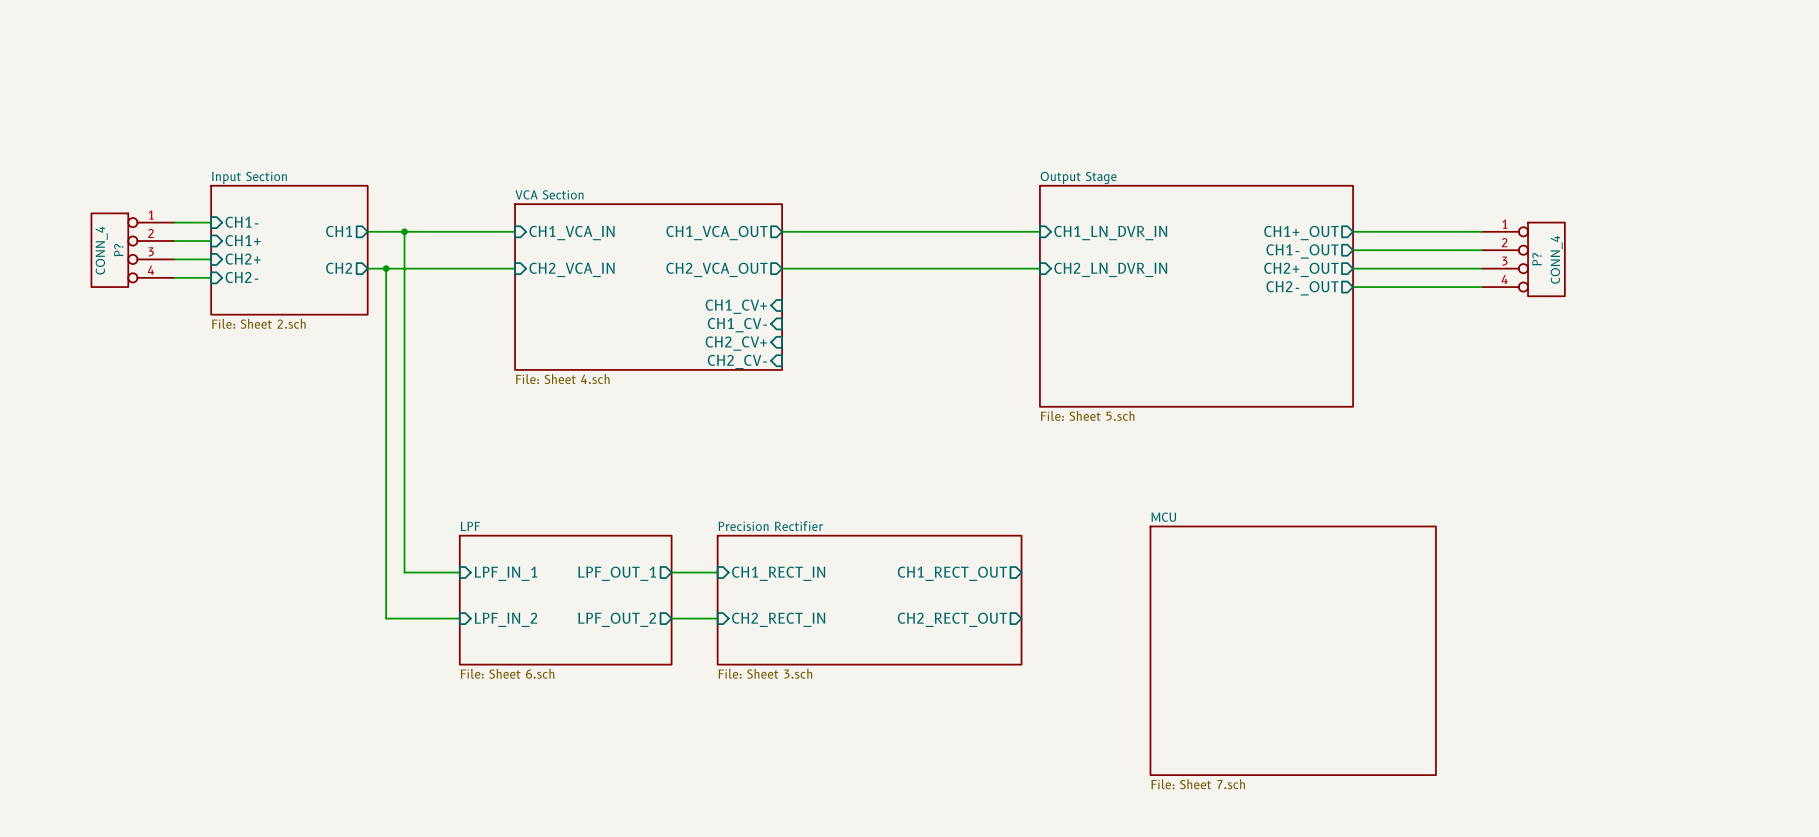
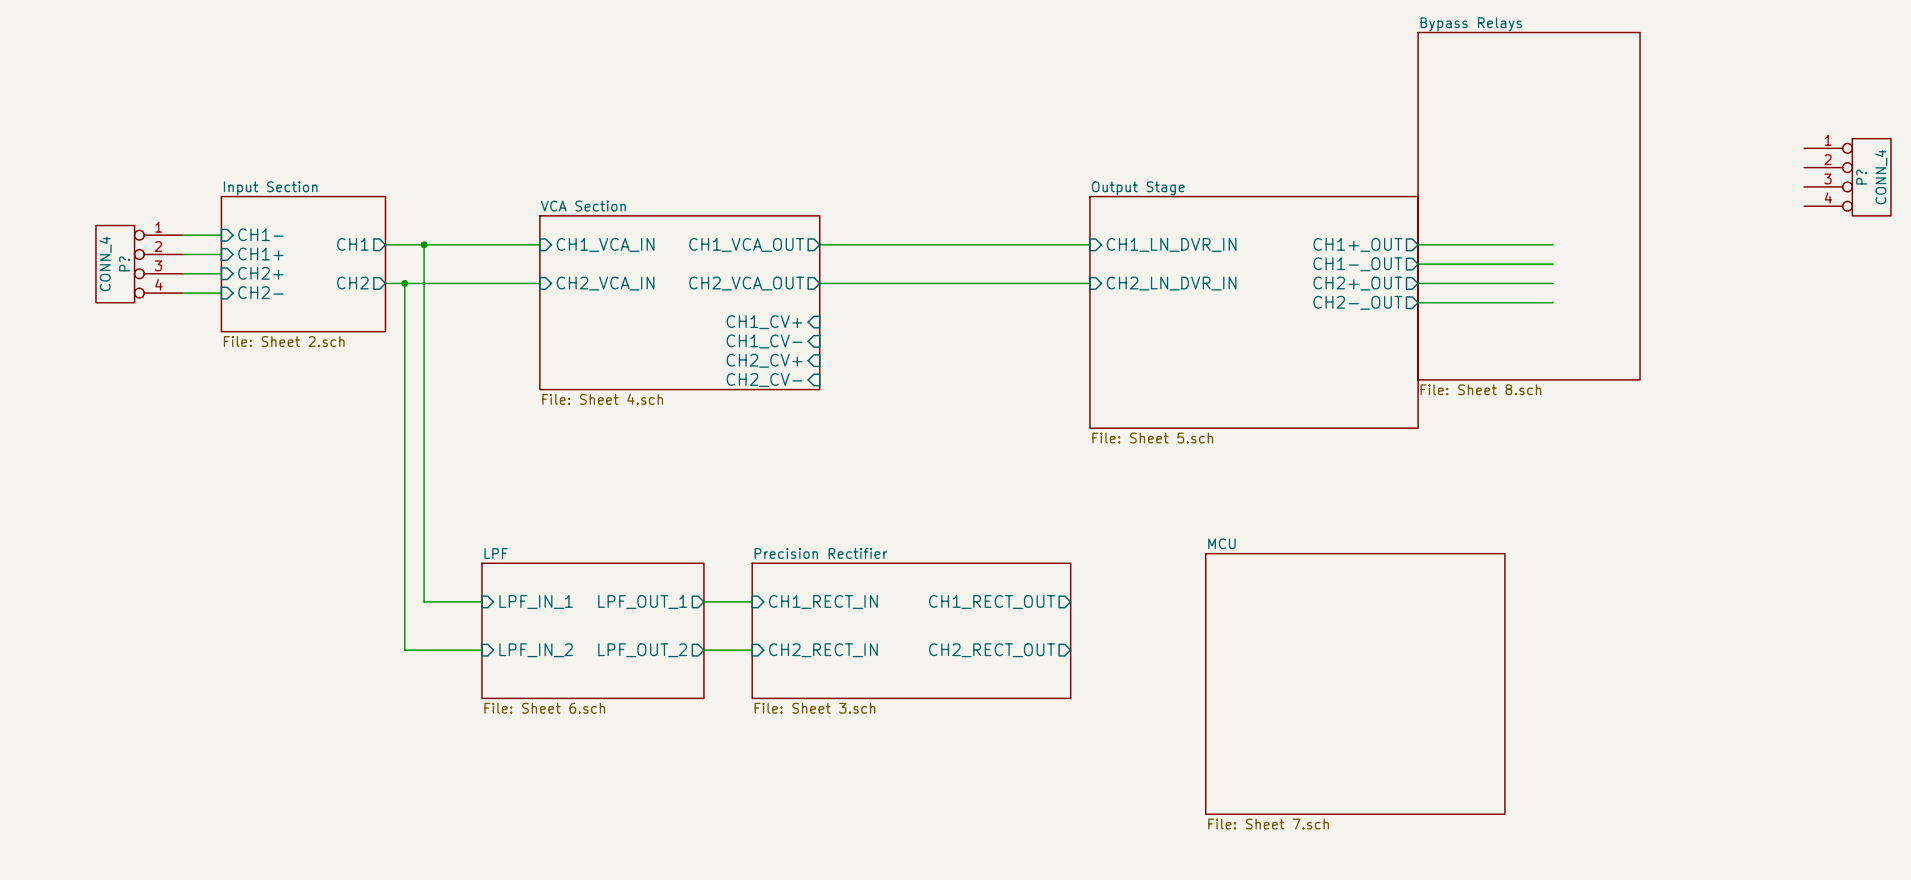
P?: none -> CONN_4 (1847, 177)
sheet Bypass Relays: none -> File: Sheet 8.sch (1529, 206)
P?: CONN_4 (1523, 259) -> none

